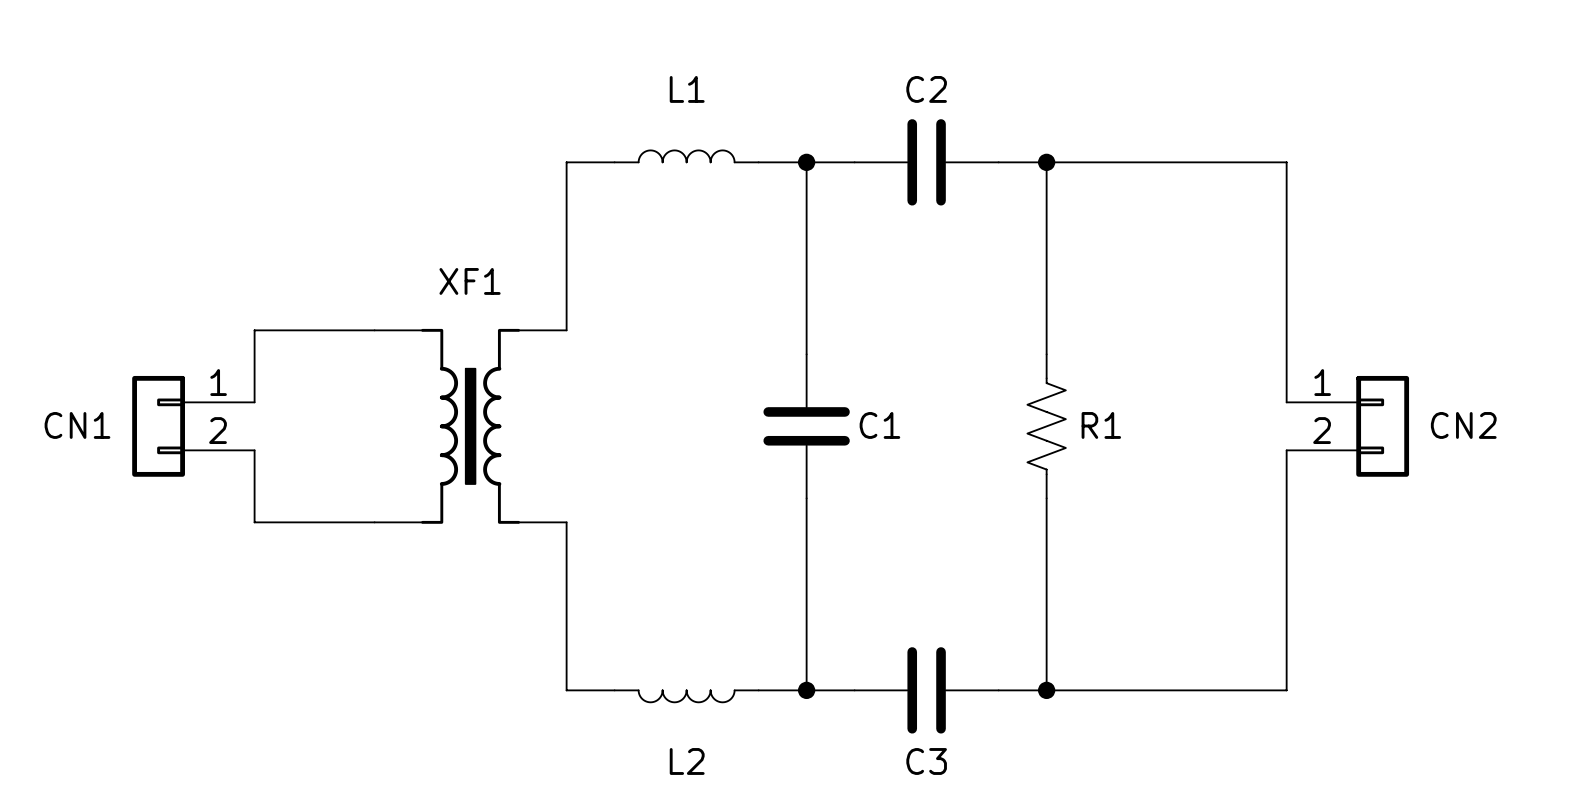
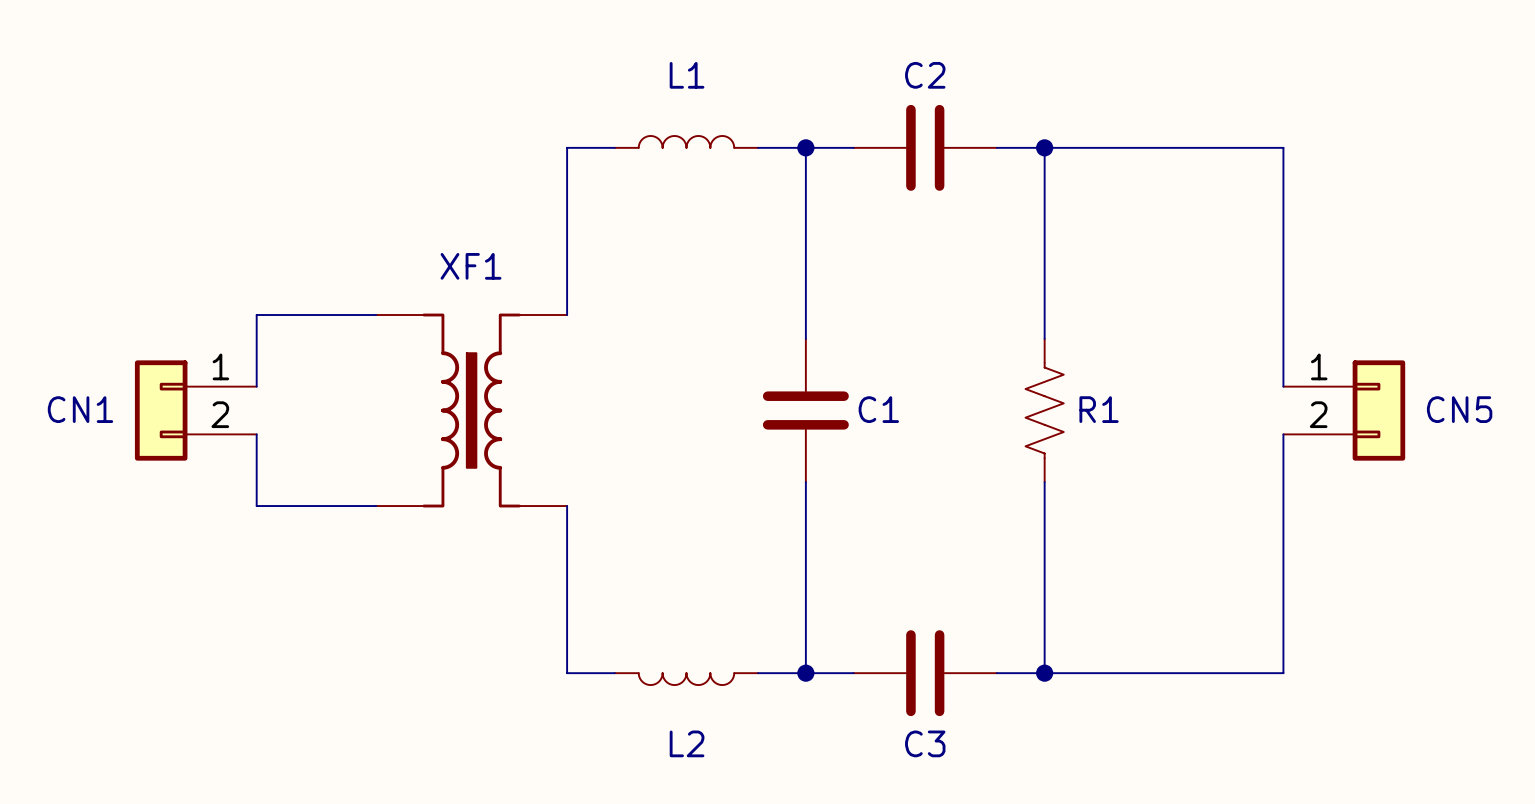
CN2 name: CN2 (1463, 425) -> CN5 (1459, 409)

